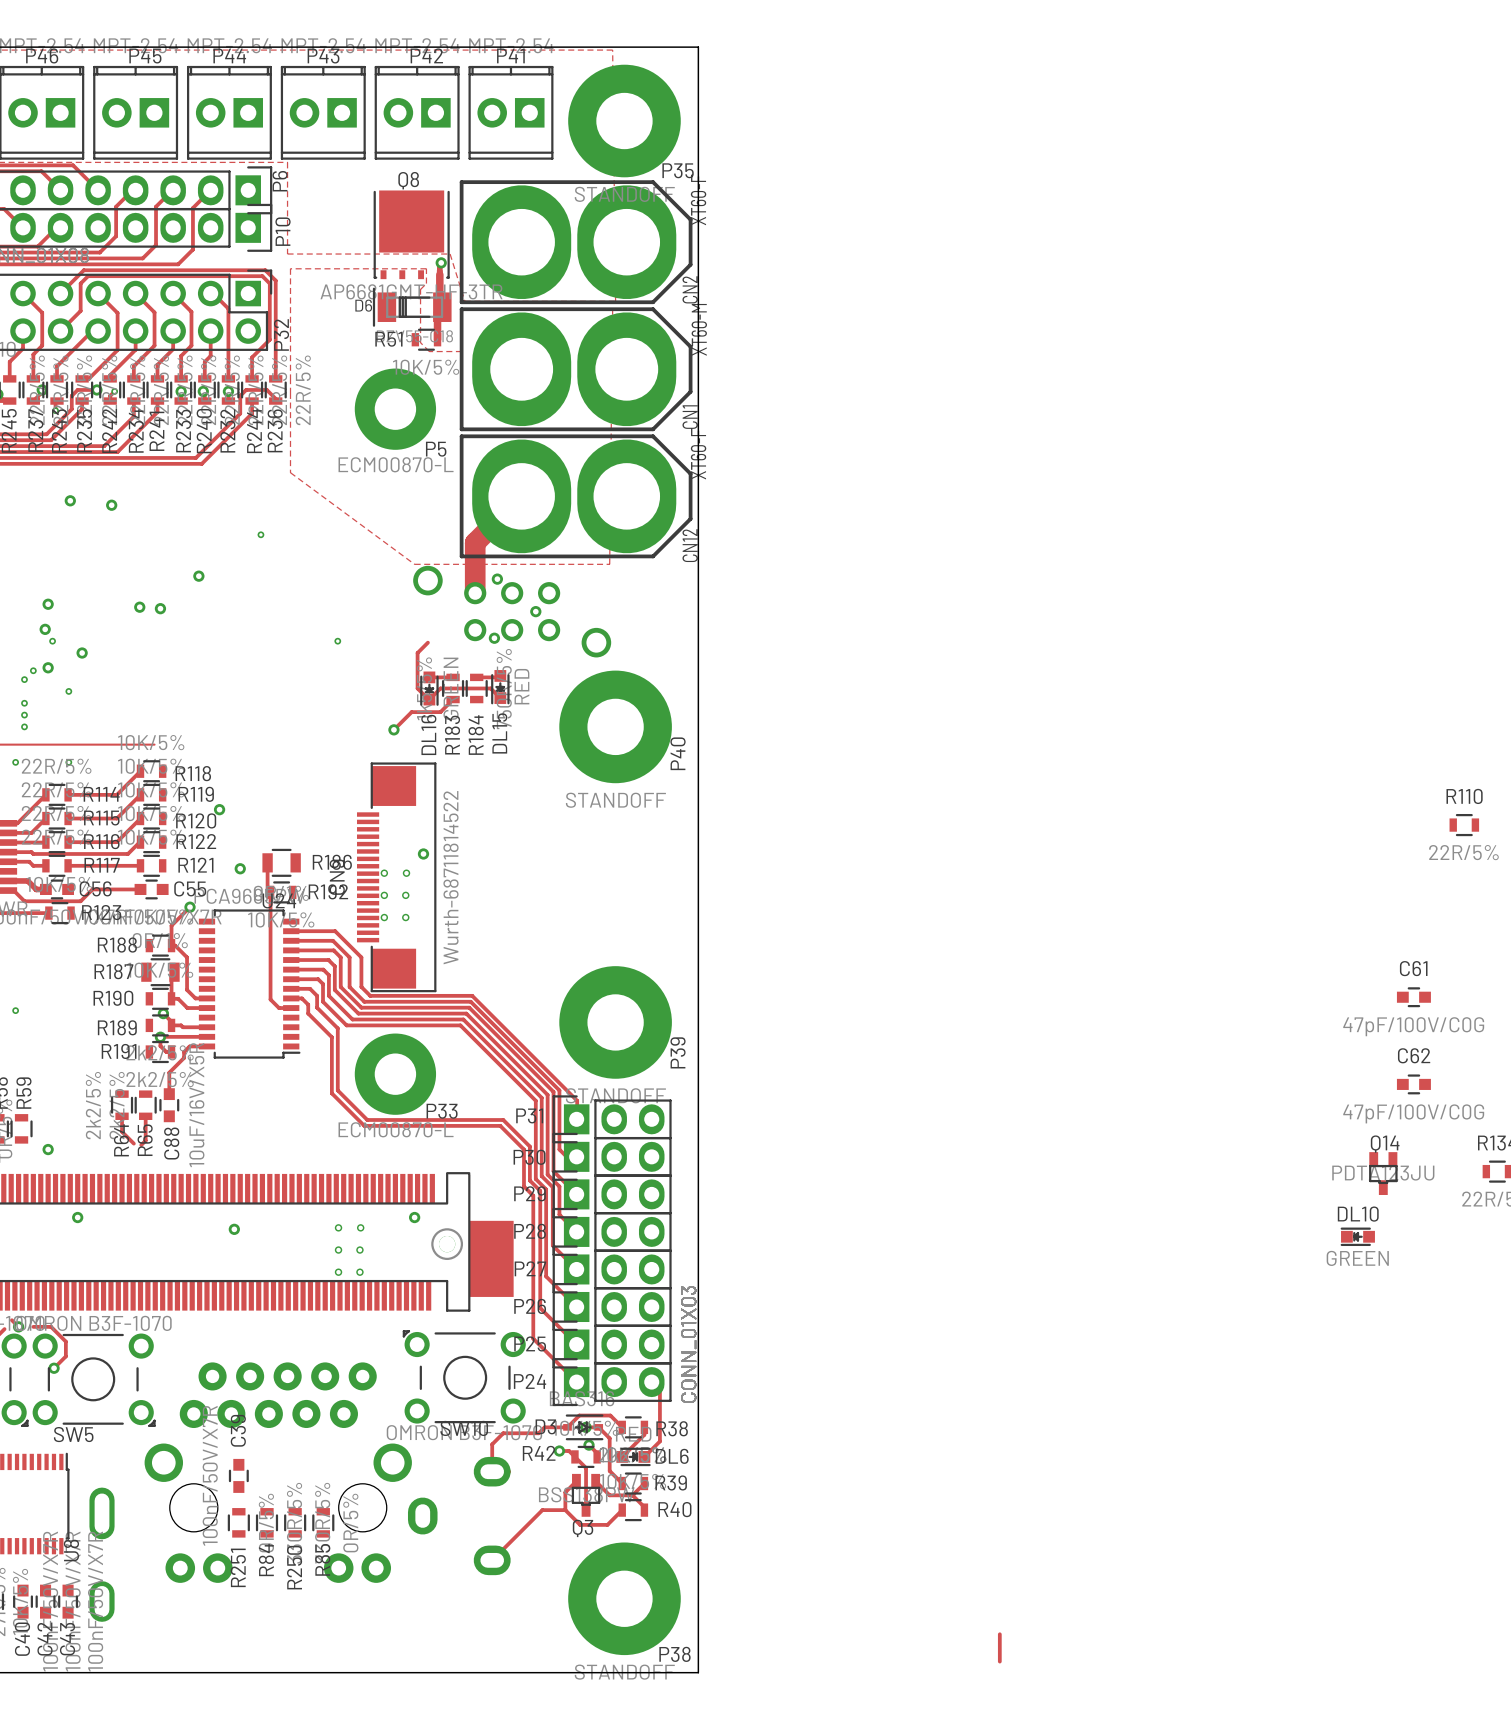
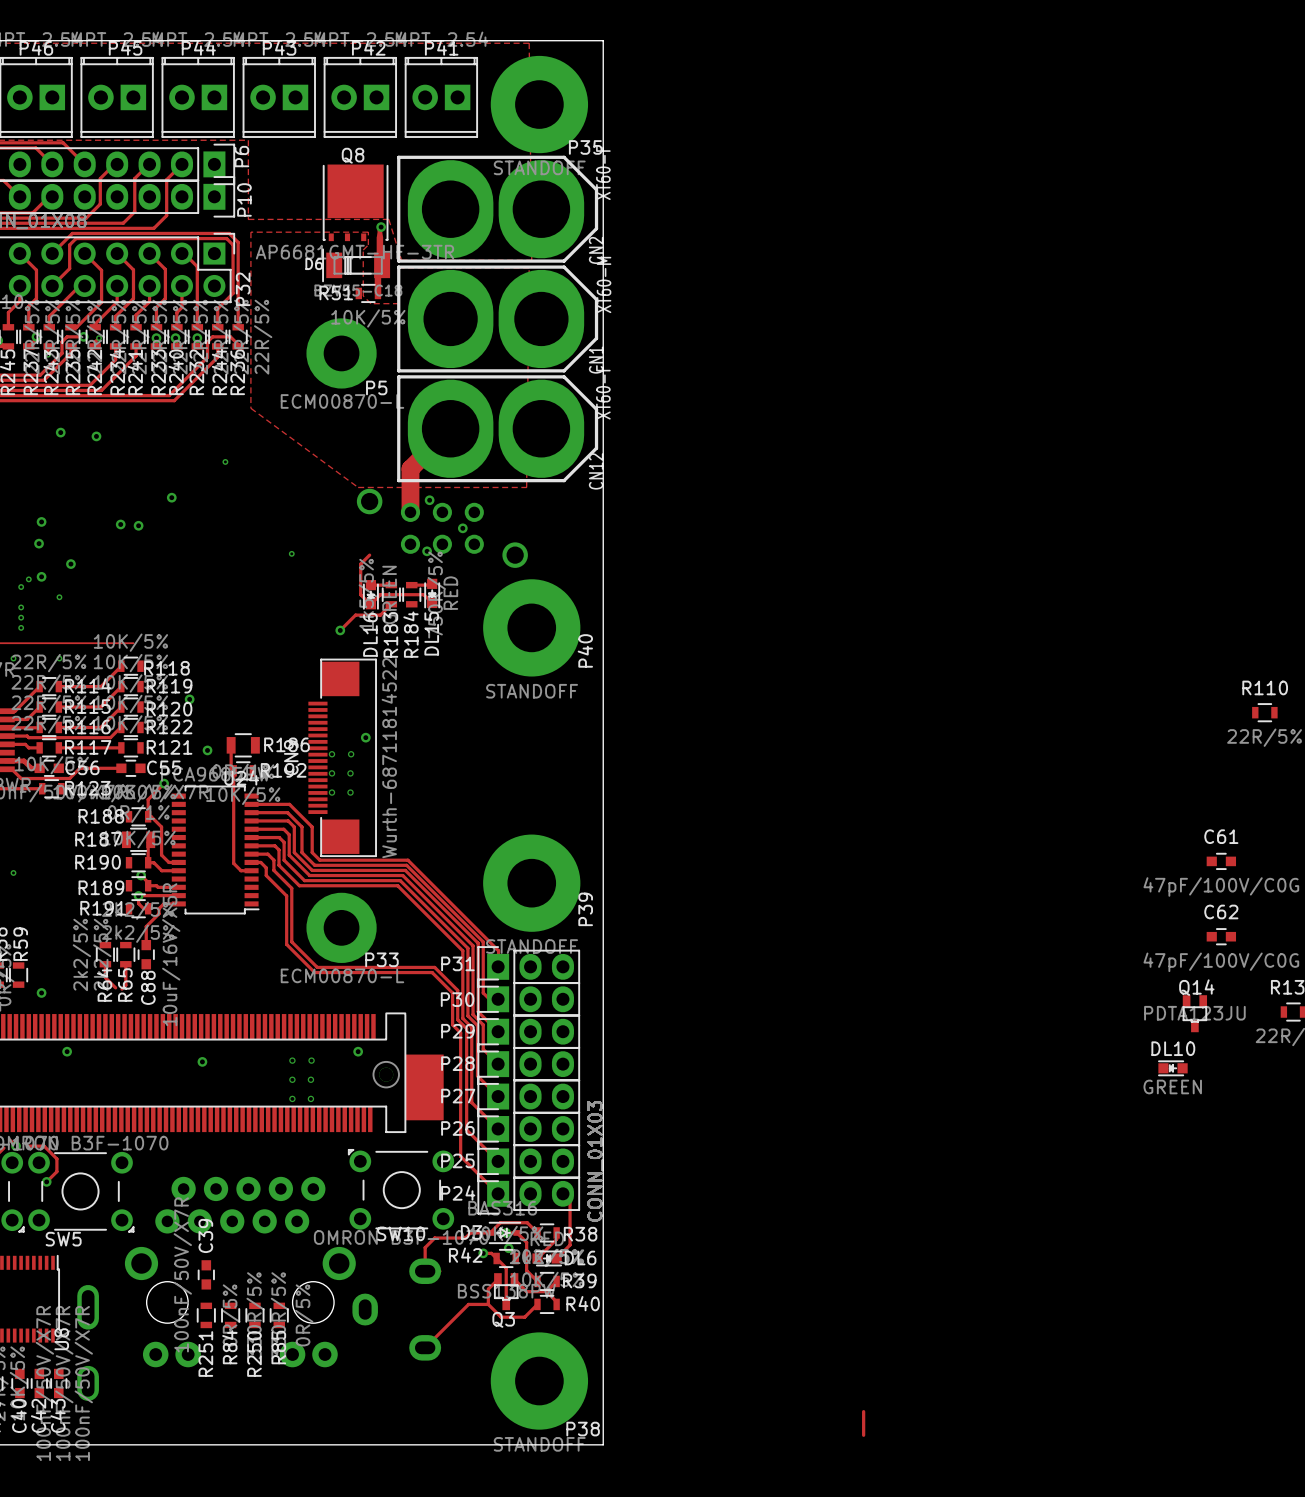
via: (52, 641) -> none

